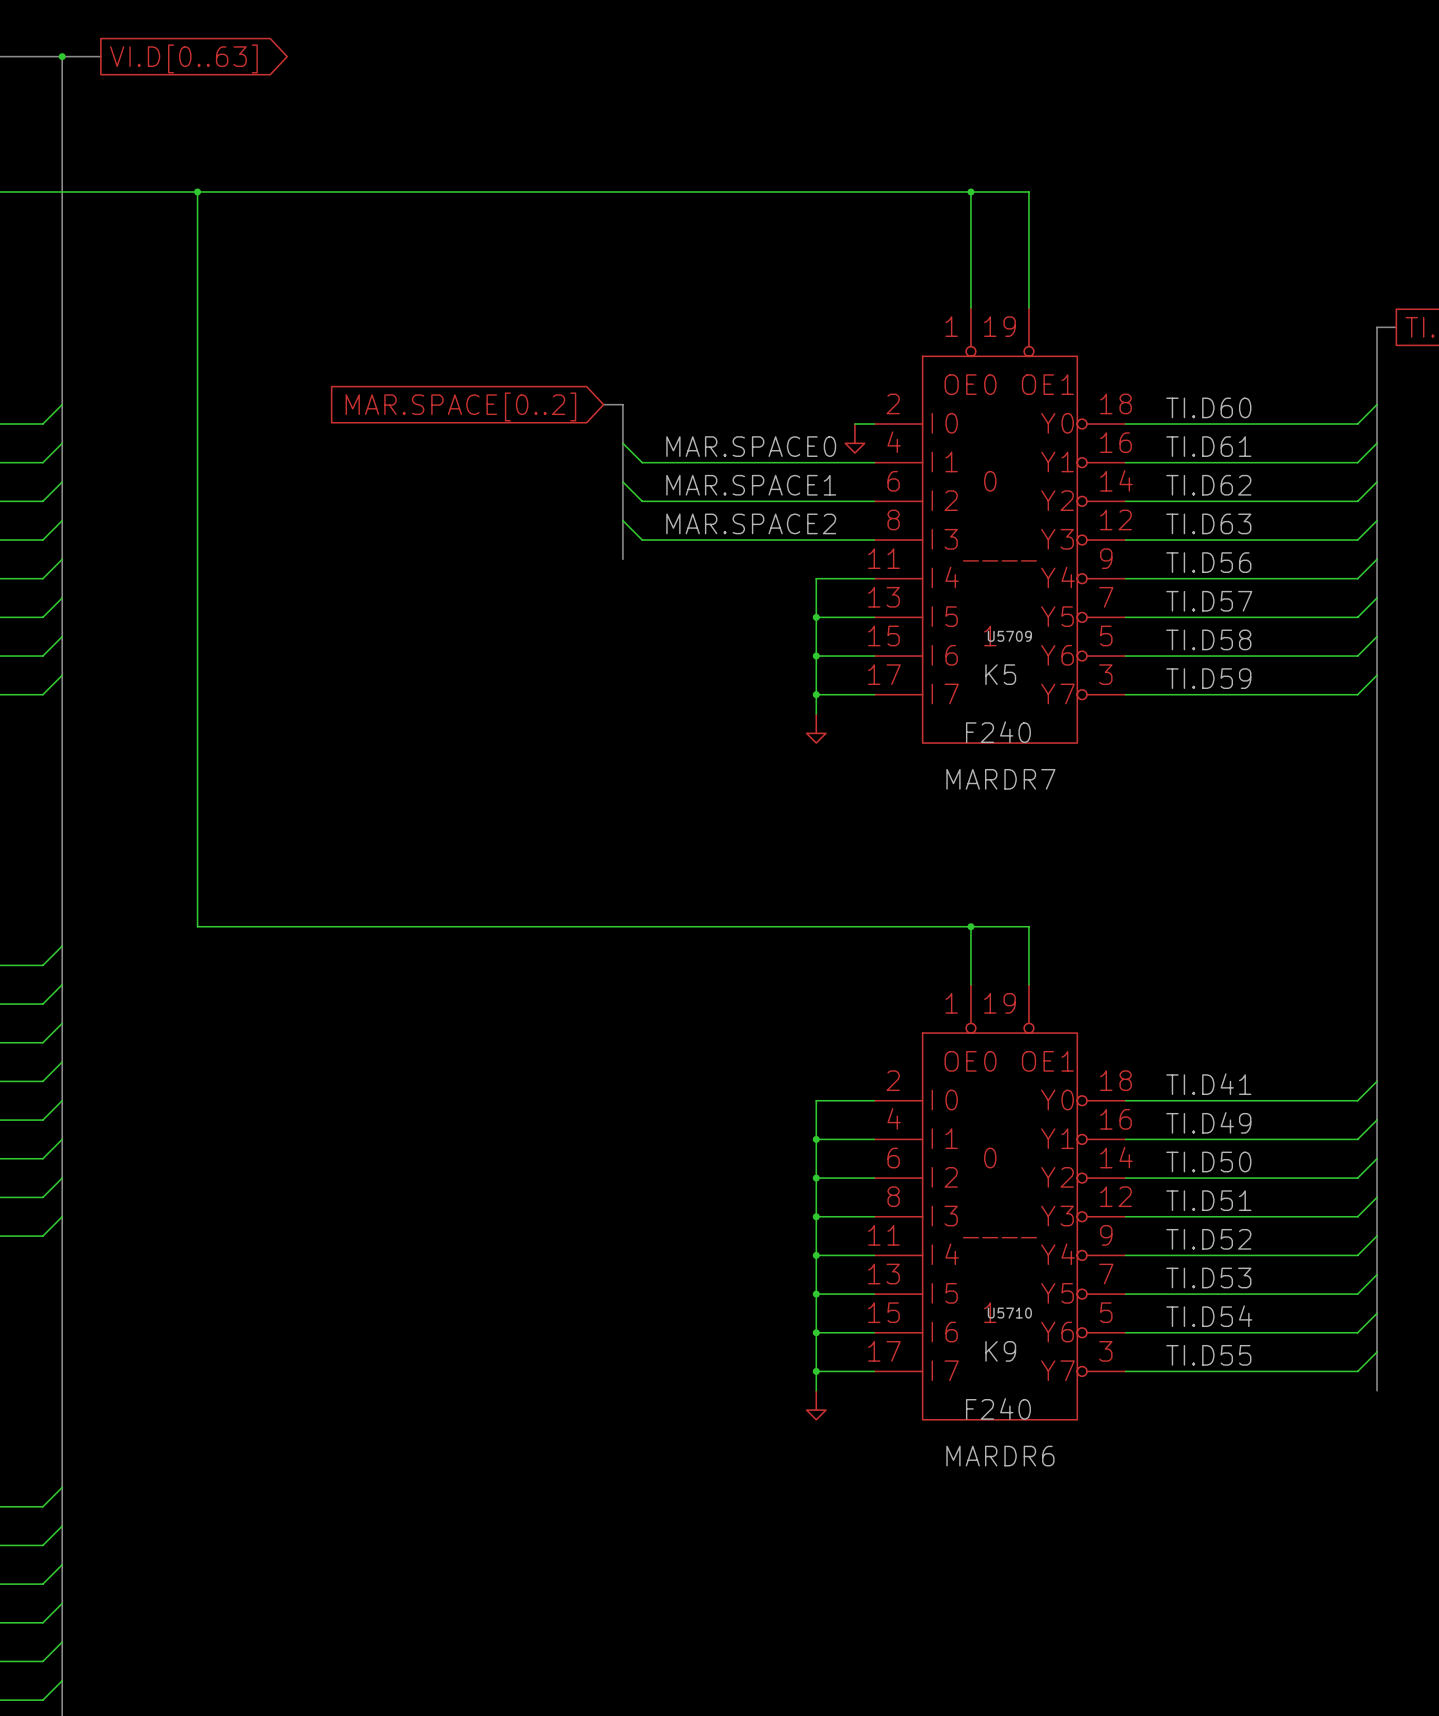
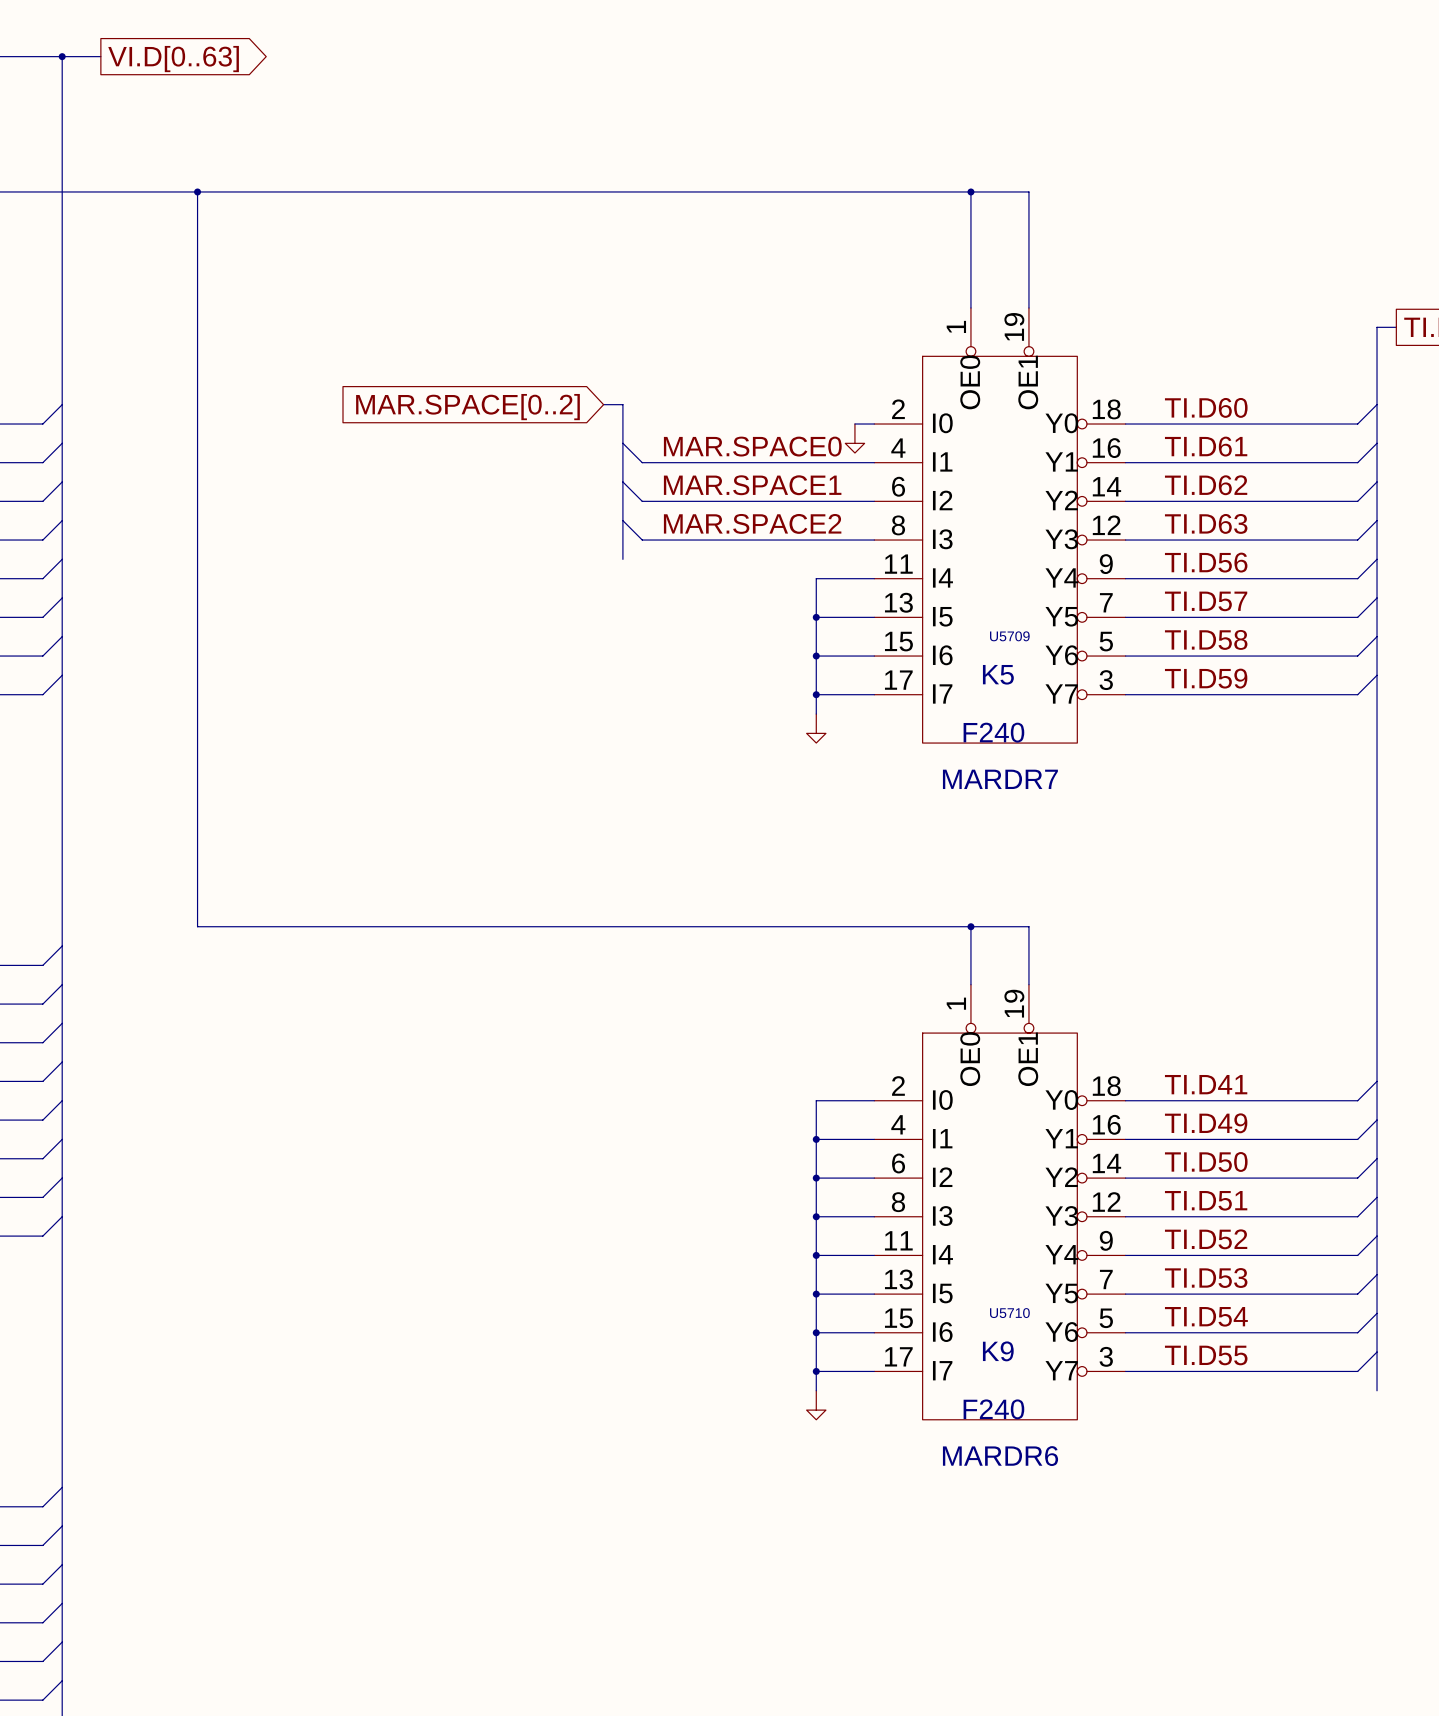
U5709 symbol: [874, 307, 1126, 744] -> [874, 307, 1126, 744]
U5710 symbol: [874, 984, 1126, 1420] -> [874, 984, 1126, 1420]

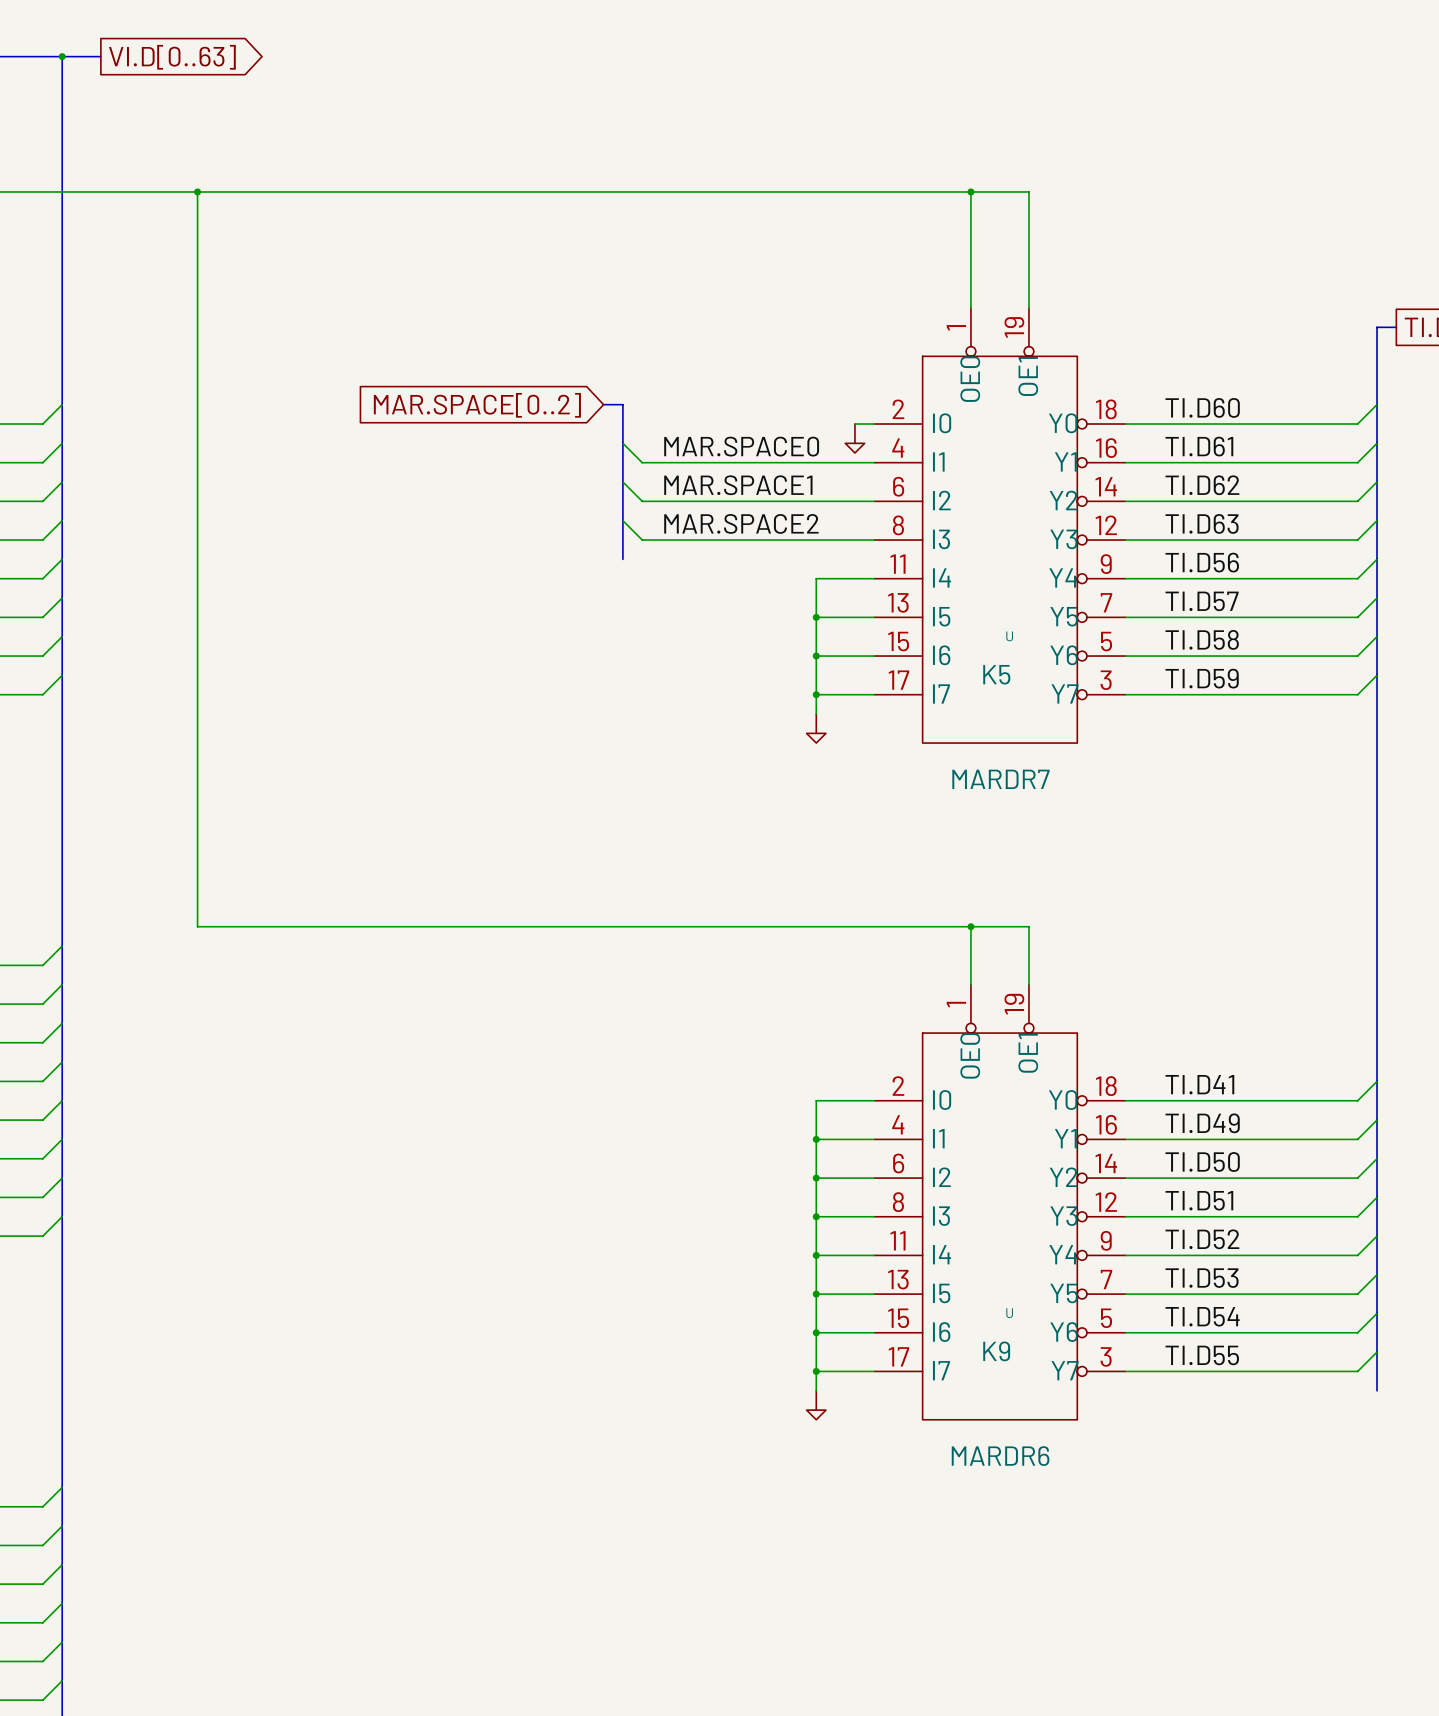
U5709 name: U5709 (1009, 636) -> U (1009, 636)
U5709 value: F240 (993, 732) -> none
U5710 name: U5710 (1009, 1313) -> U (1009, 1313)
U5710 value: F240 (993, 1409) -> none

